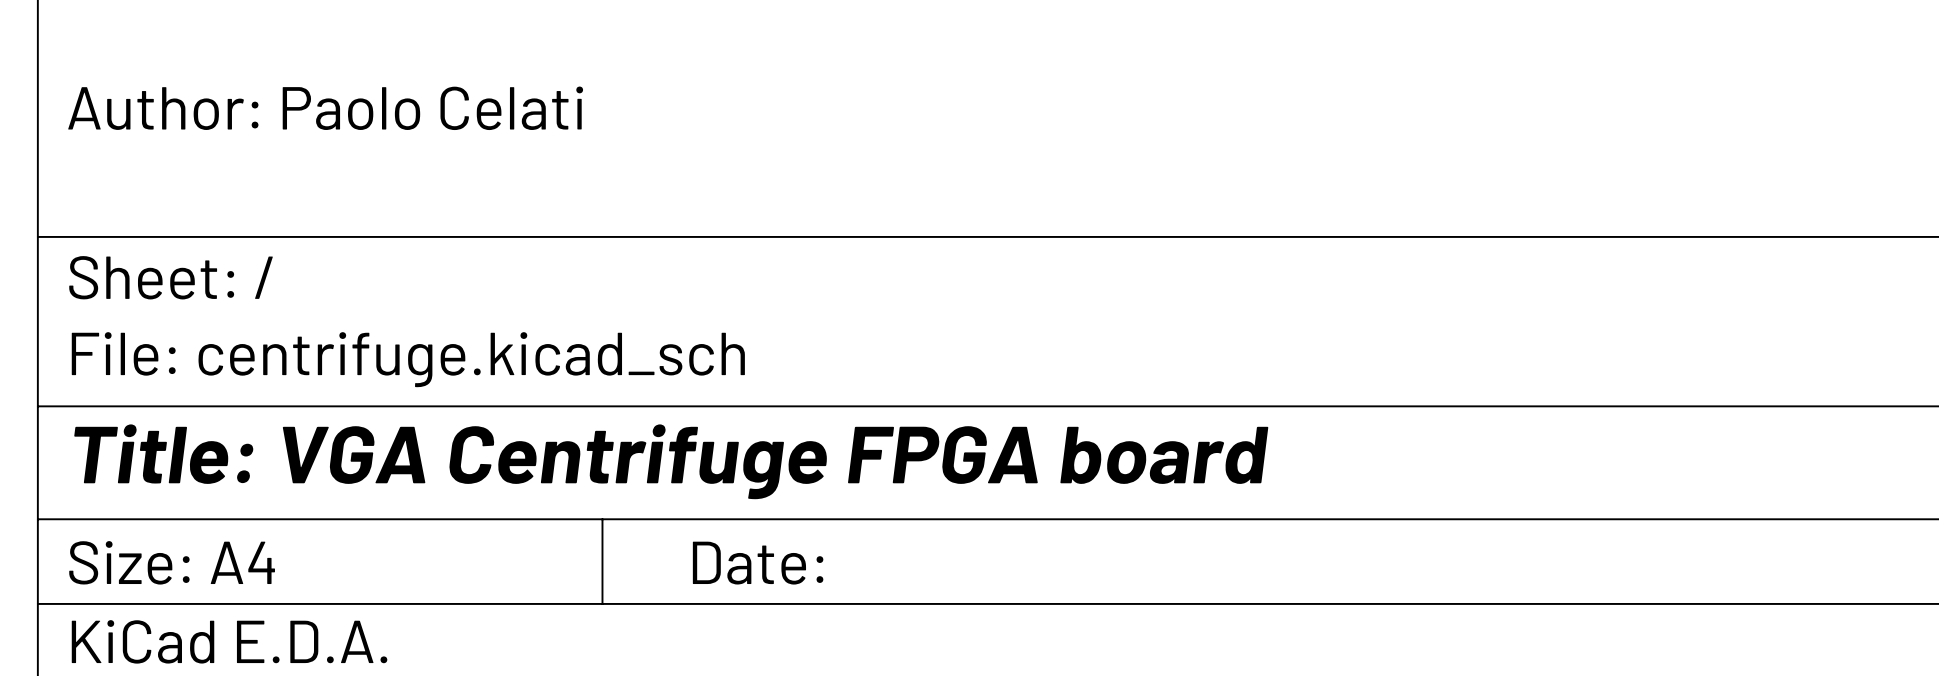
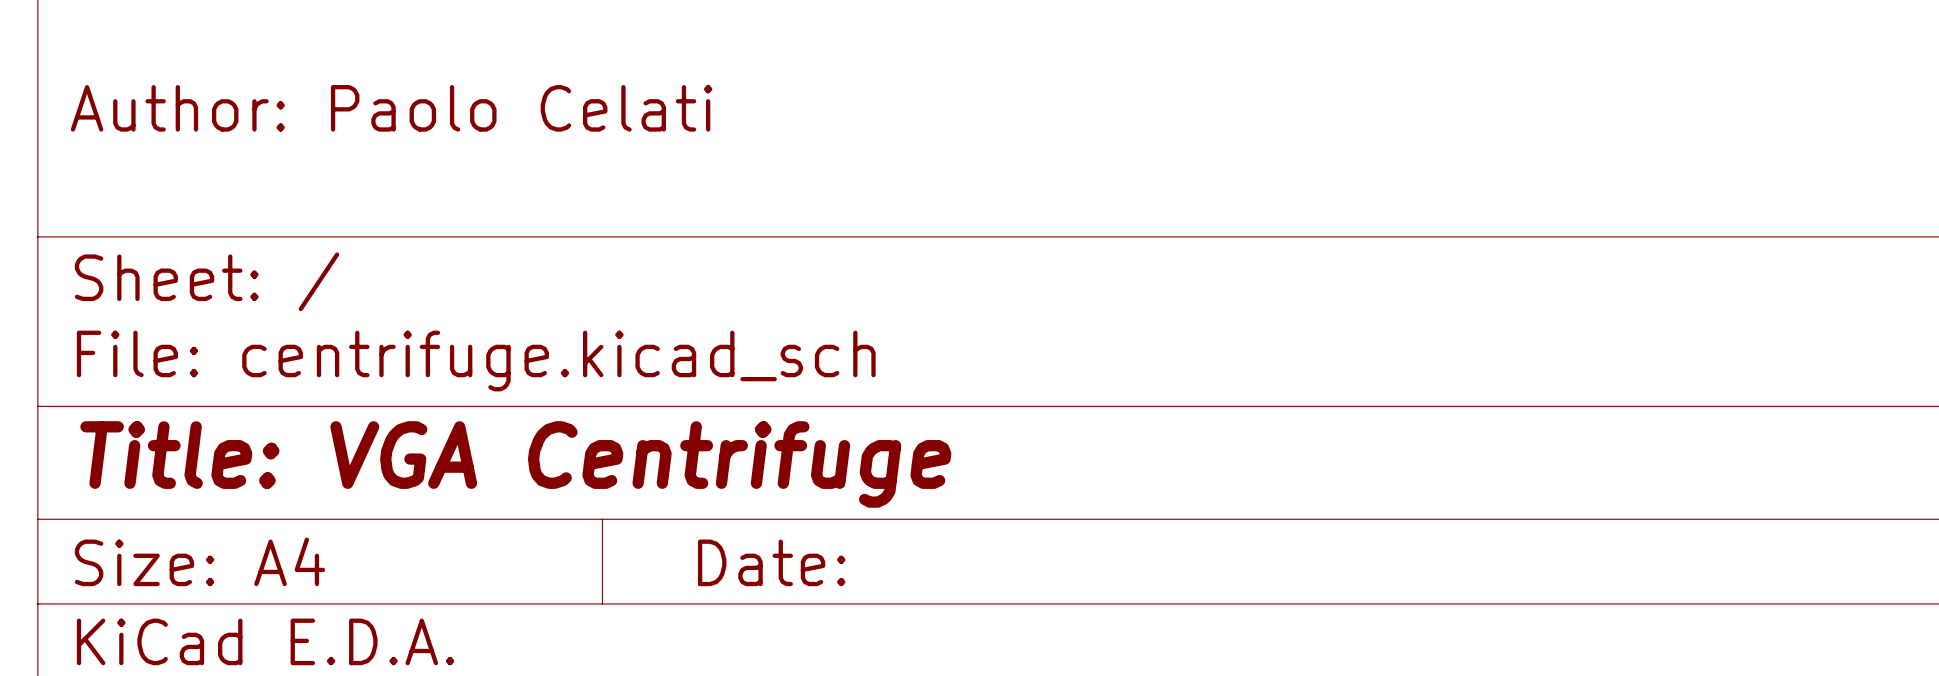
title block: Title: VGA Centrifuge FPGA board (671, 461) -> Title: VGA Centrifuge (515, 464)

